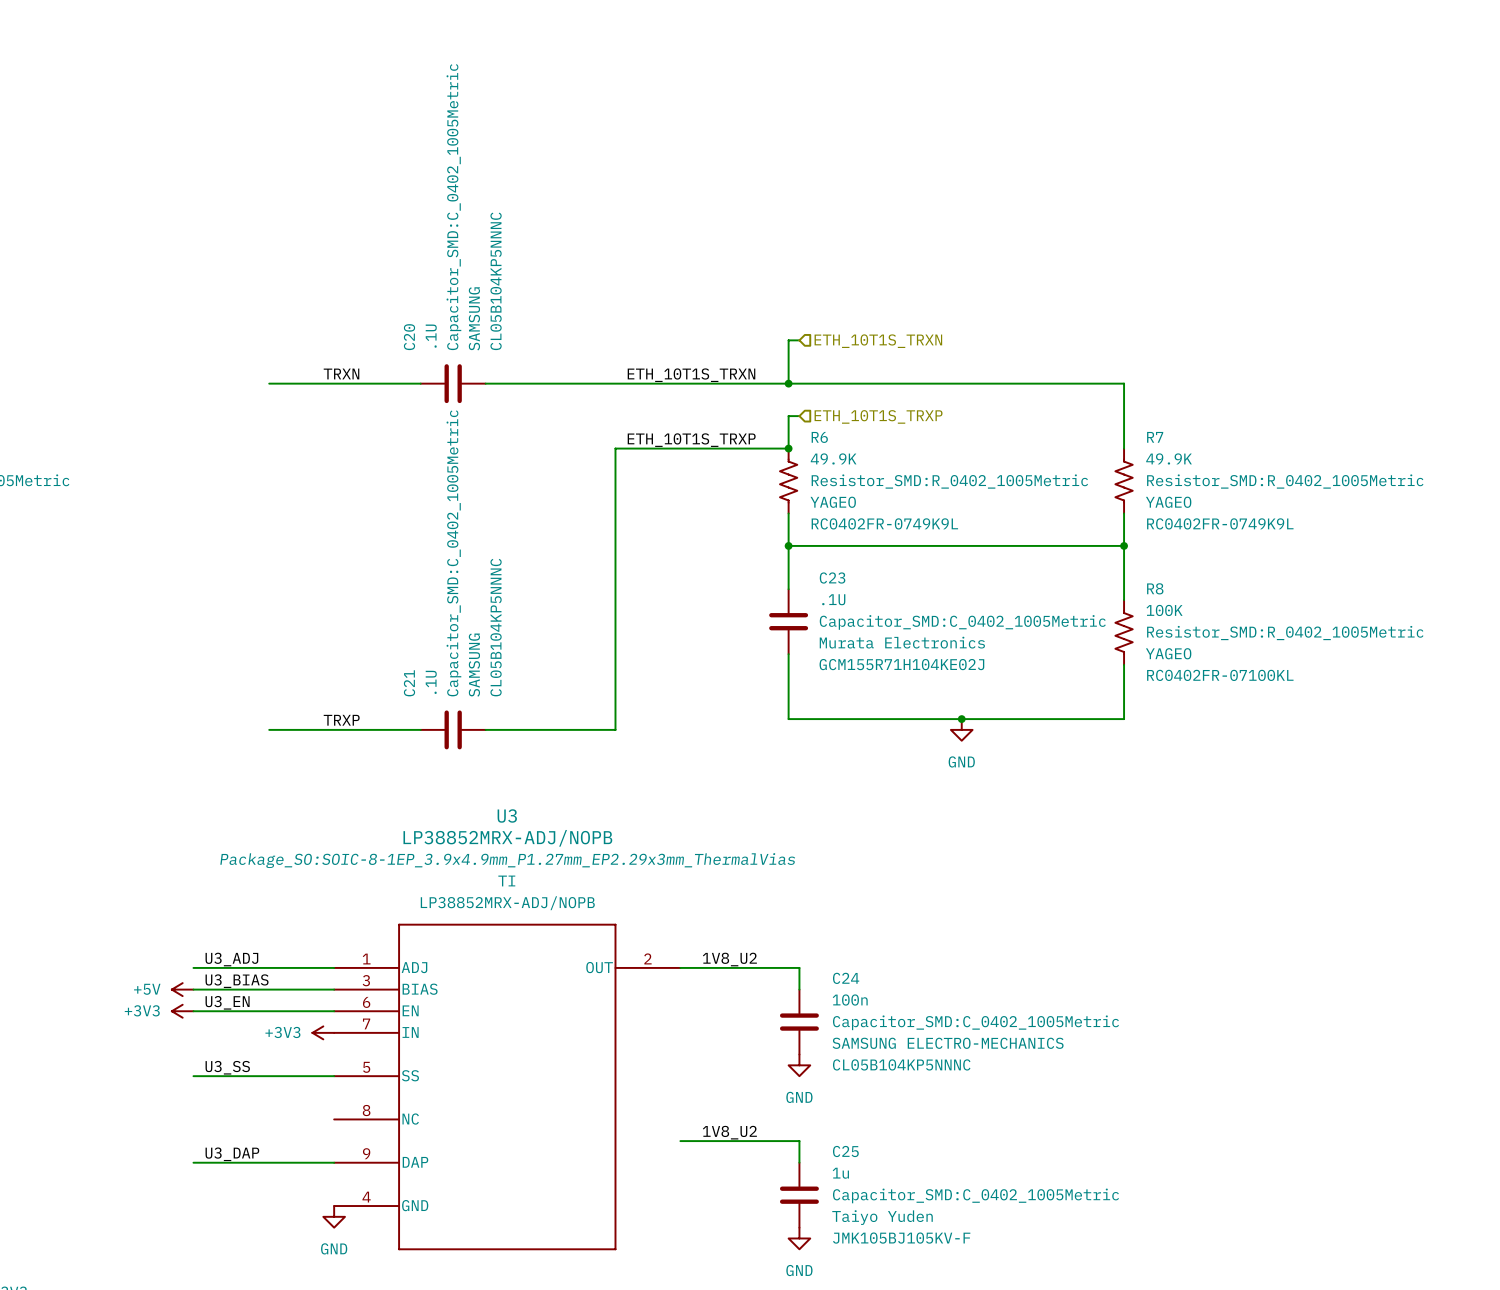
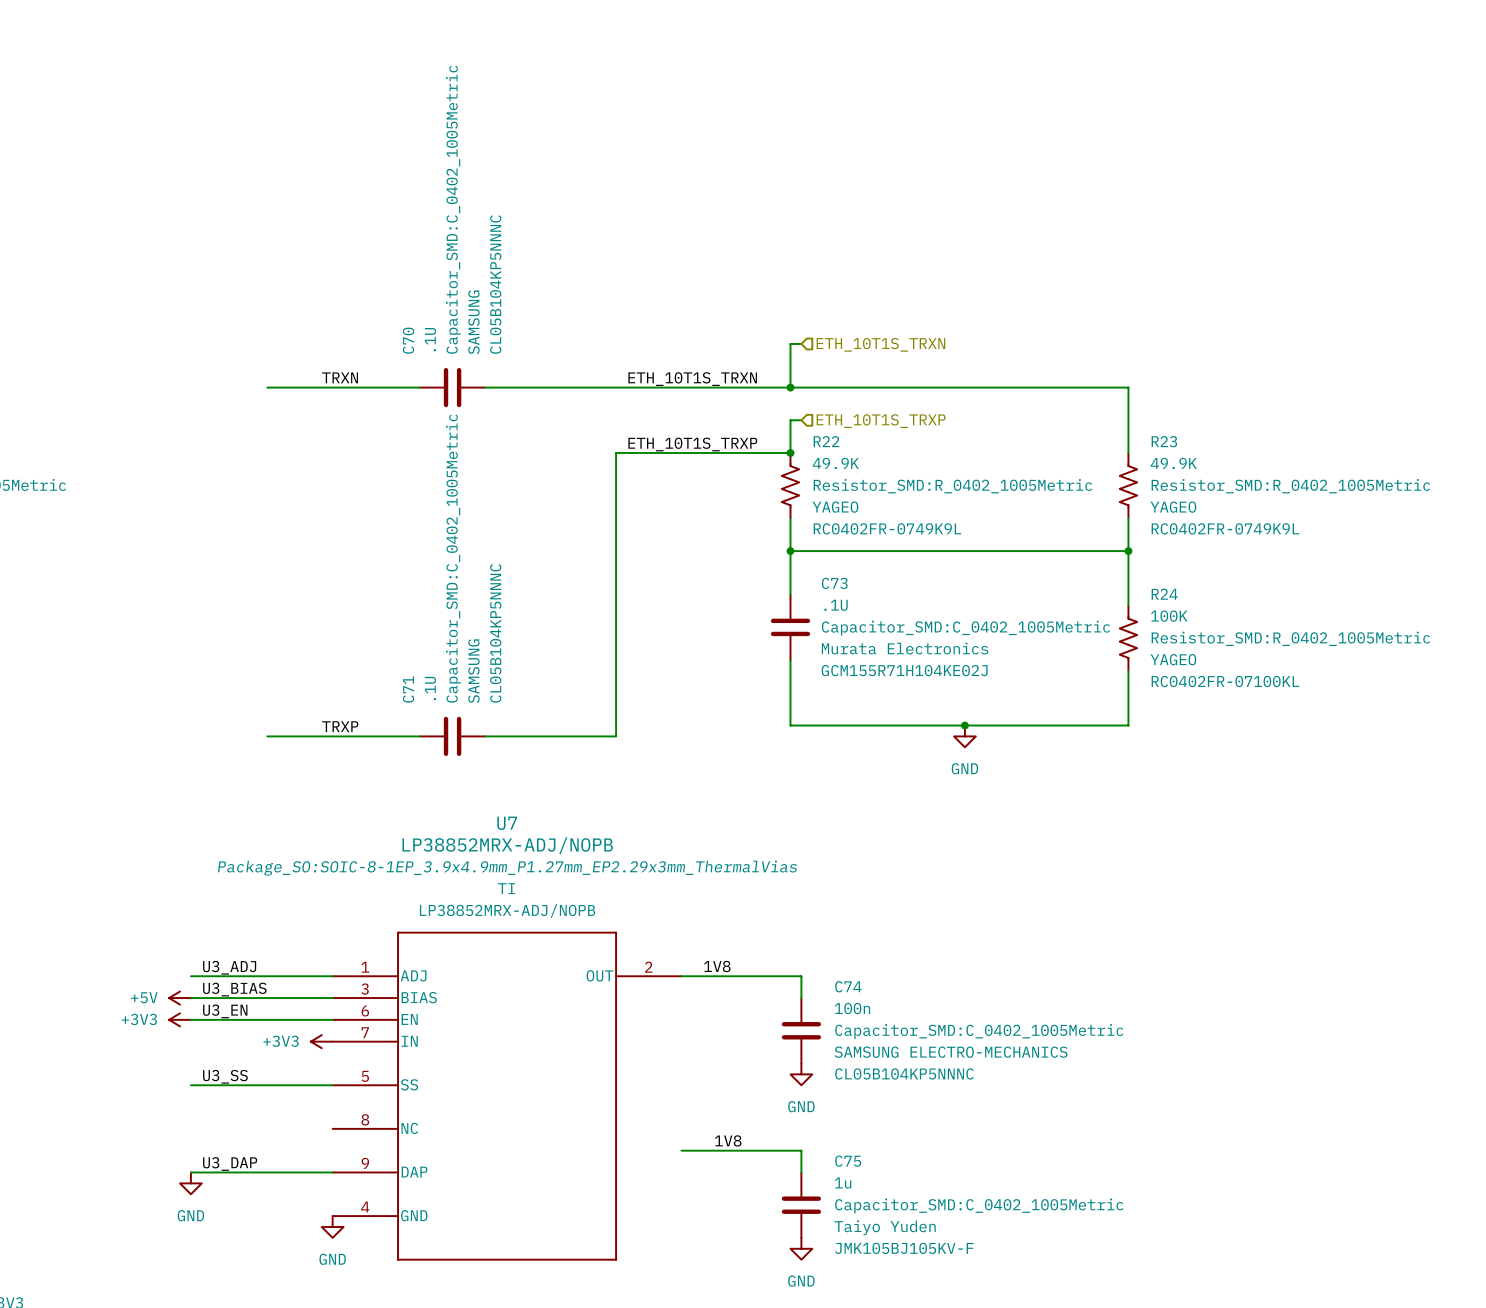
C20 name: C20 (409, 337) -> C70 (408, 340)
R6 name: R6 (819, 437) -> R22 (826, 441)
R7 name: R7 (1155, 437) -> R23 (1164, 441)
C23 name: C23 (832, 578) -> C73 (834, 583)
R8 name: R8 (1155, 588) -> R24 (1164, 594)
C21 name: C21 (409, 683) -> C71 (408, 689)
U3 name: U3 (507, 815) -> U7 (507, 823)
label: 1V8_U2 (729, 959) -> 1V8 (717, 966)
C24 name: C24 (846, 978) -> C74 (848, 986)
label: 1V8_U2 (729, 1132) -> 1V8 (728, 1140)
C25 name: C25 (845, 1151) -> C75 (848, 1161)
power symbol: none -> GND (190, 1183)

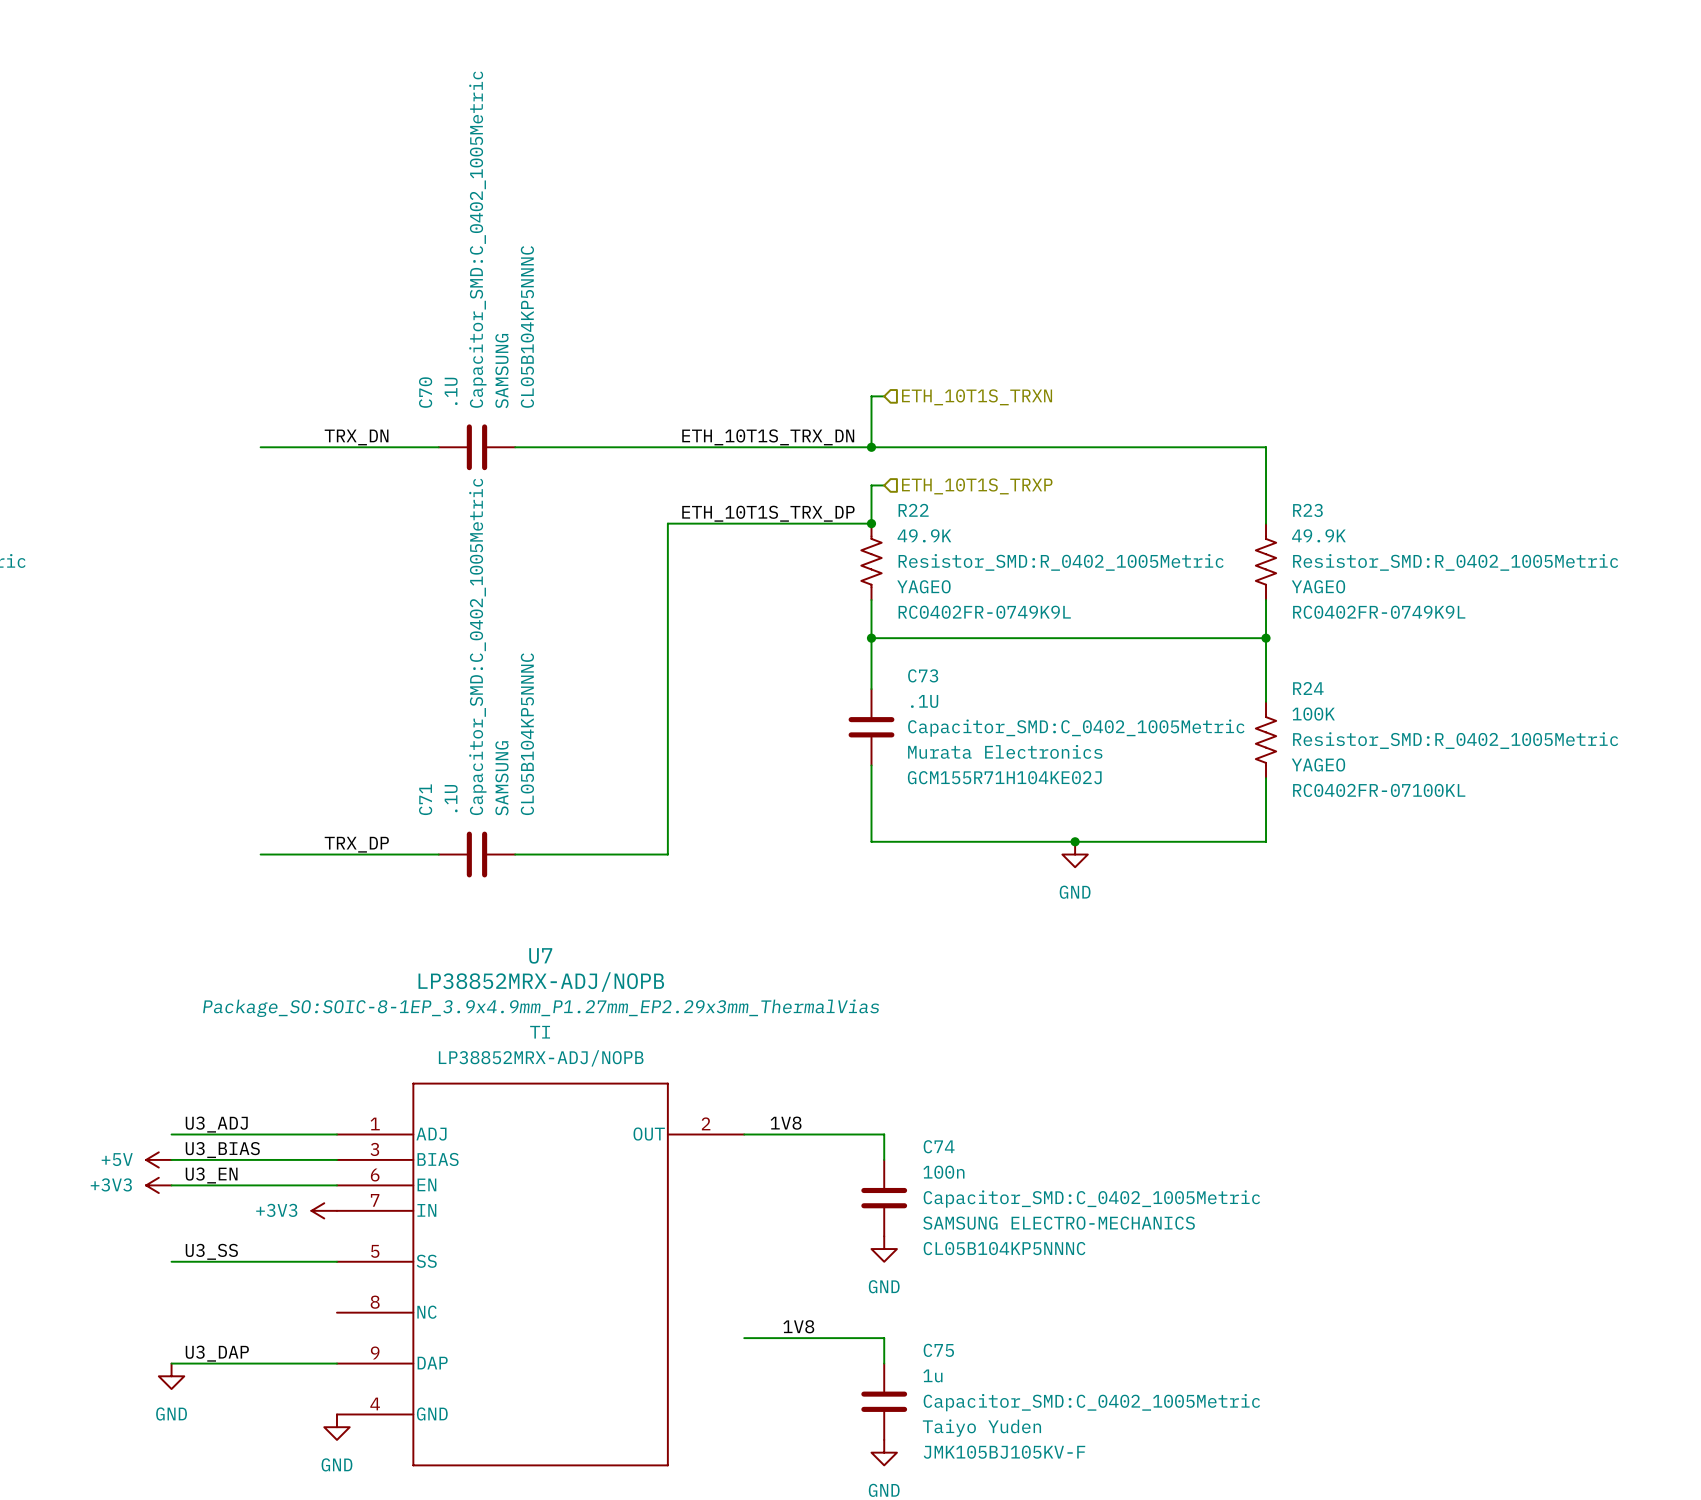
label: TRXN (340, 377) -> TRX_DN (356, 437)
label: ETH_10T1S_TRXN (692, 379) -> ETH_10T1S_TRX_DN (768, 437)
label: ETH_10T1S_TRXP (692, 444) -> ETH_10T1S_TRX_DP (768, 513)
label: TRXP (340, 726) -> TRX_DP (356, 844)

